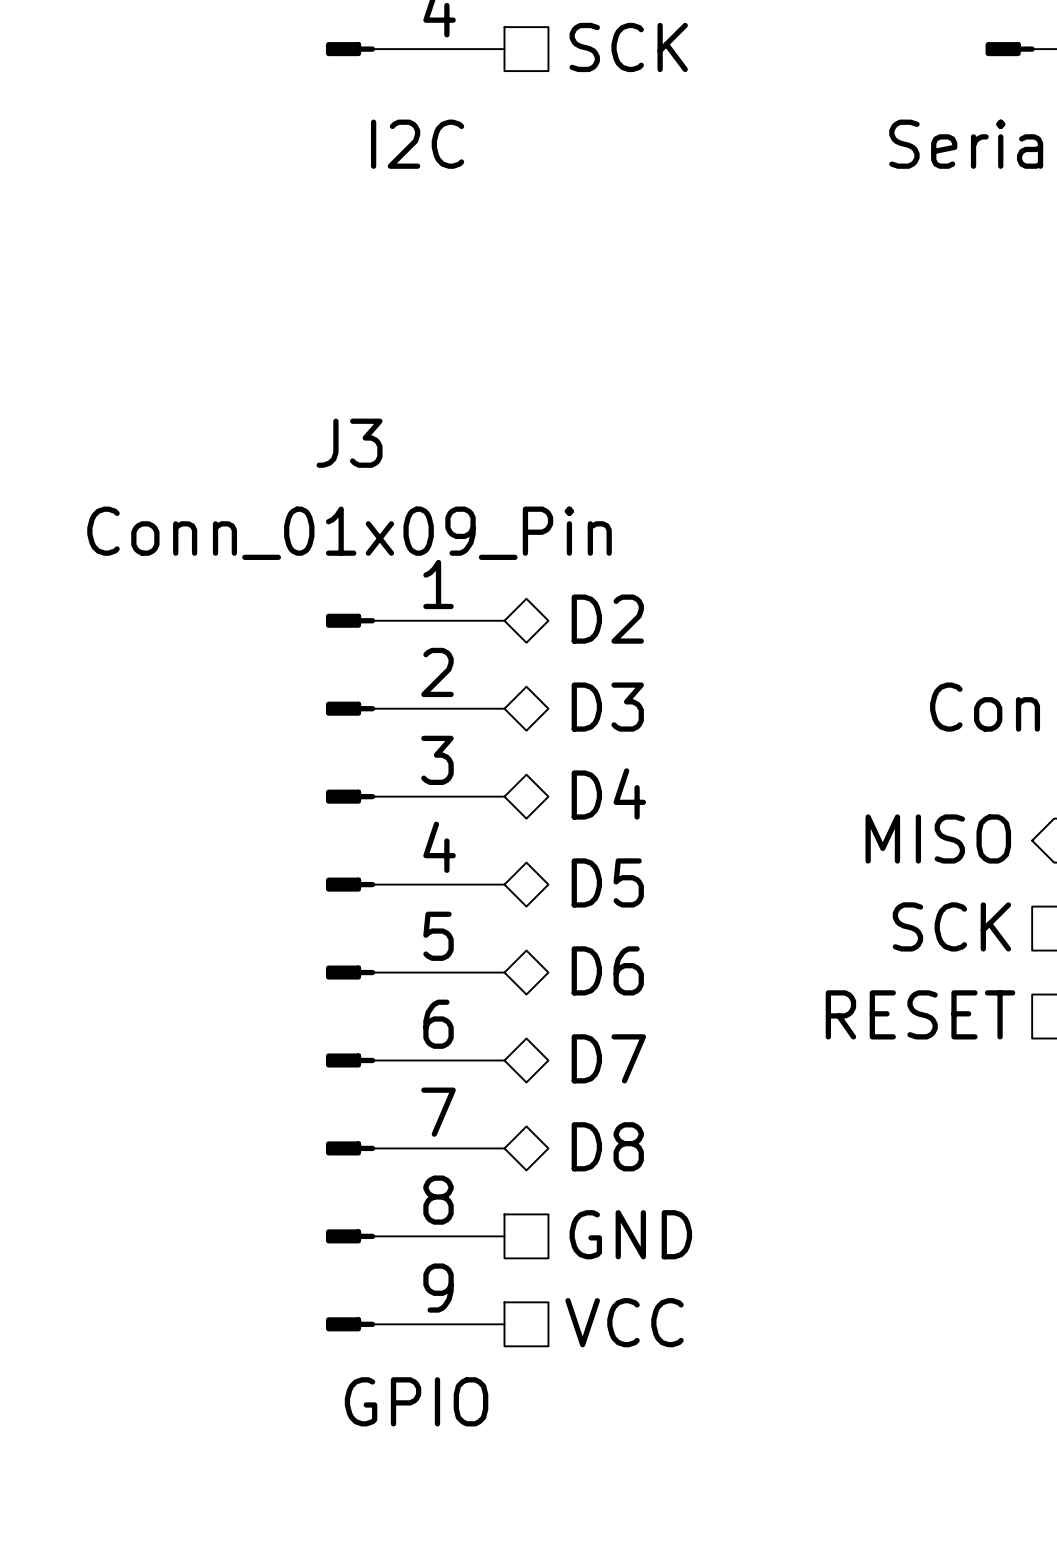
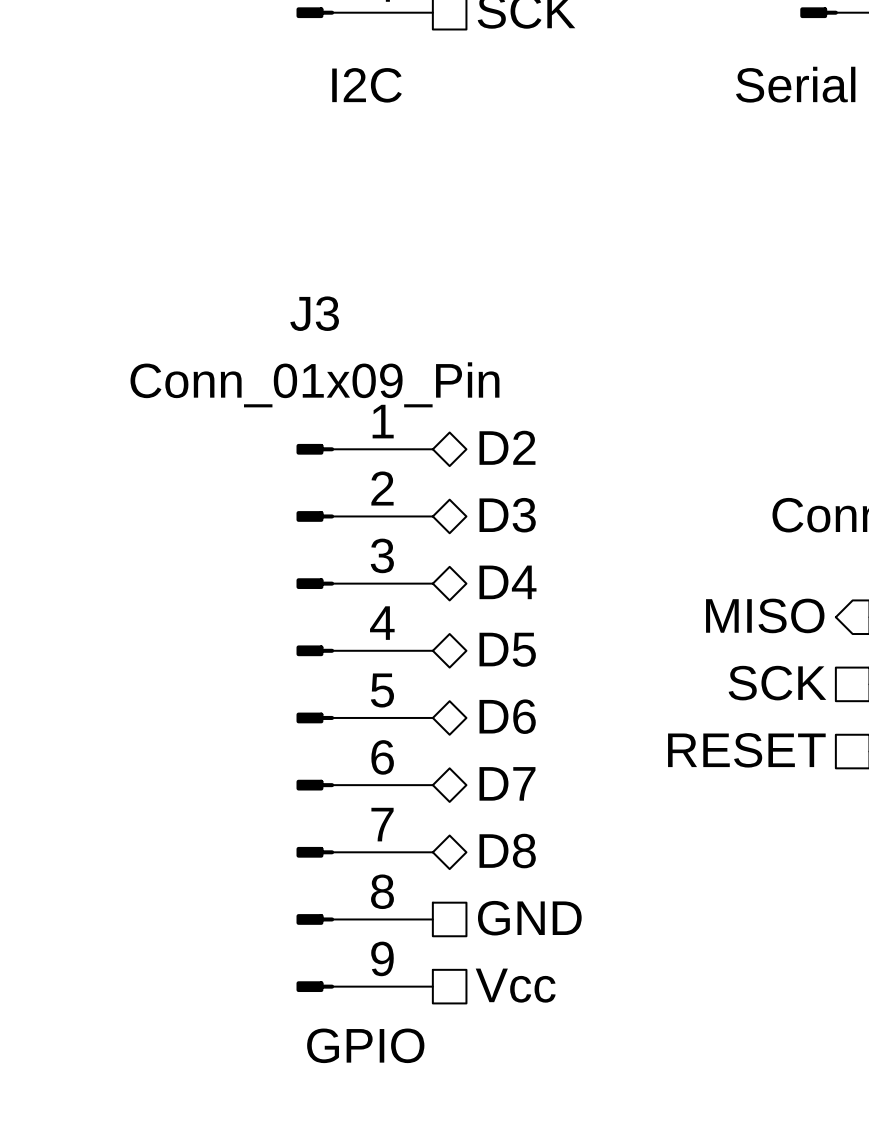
hierarchical label: VCC (624, 1322) -> Vcc (515, 985)

